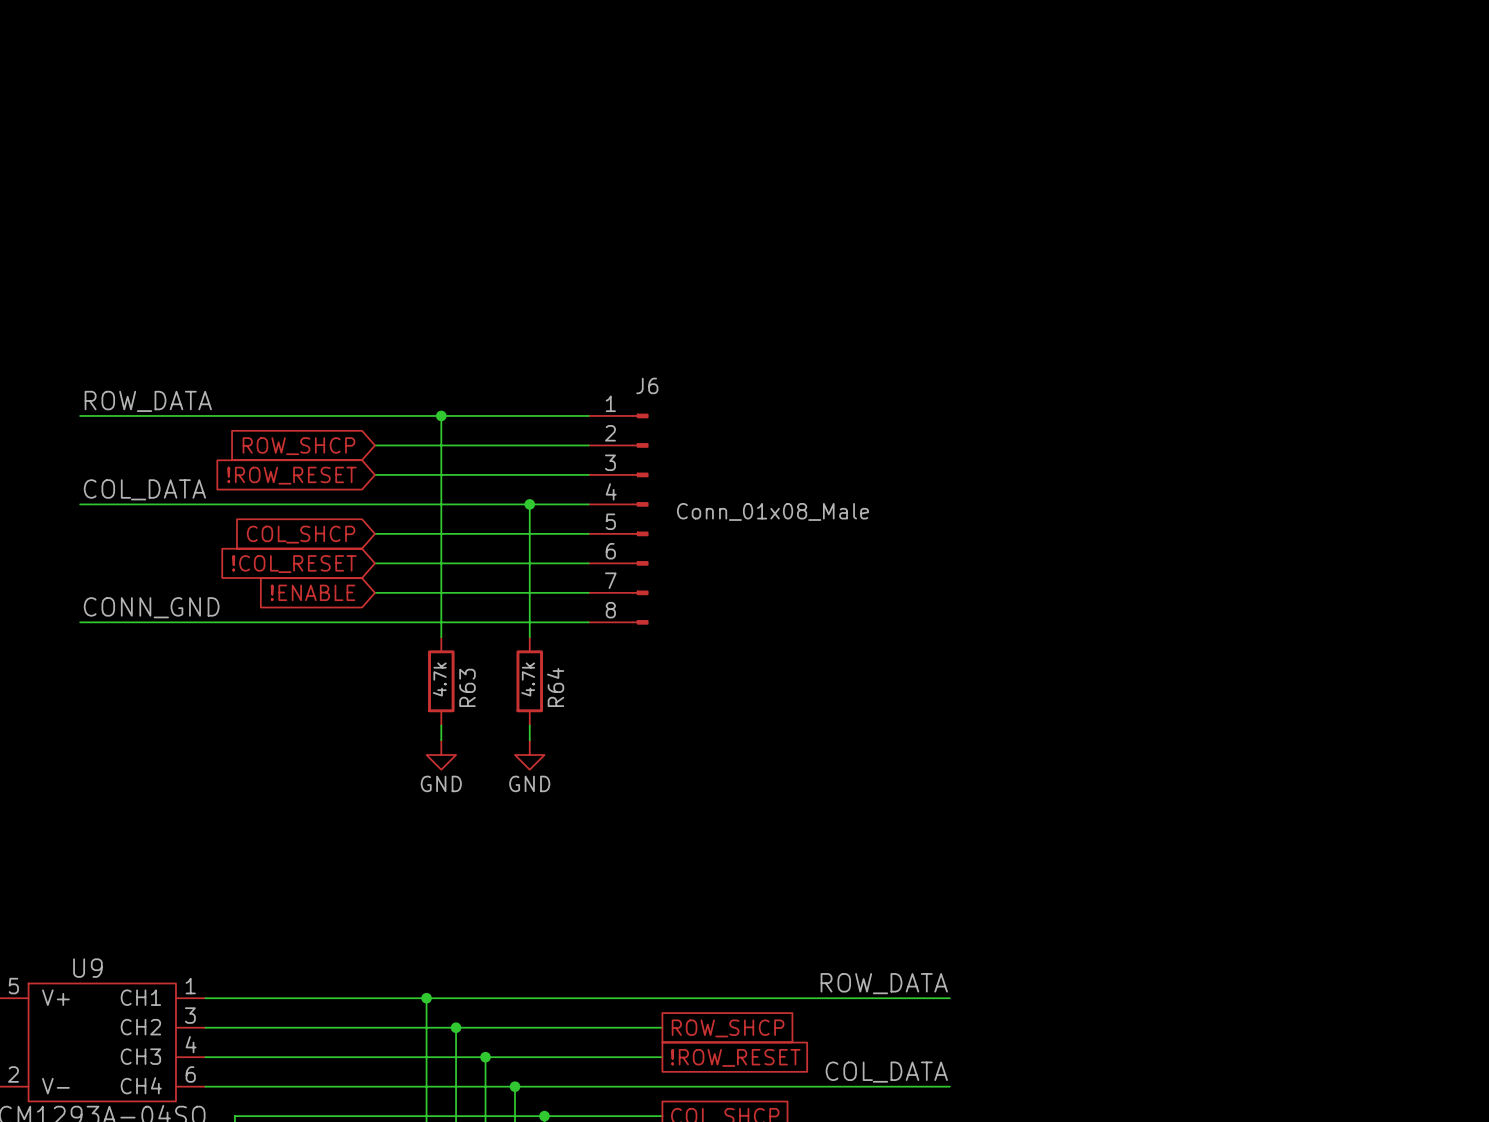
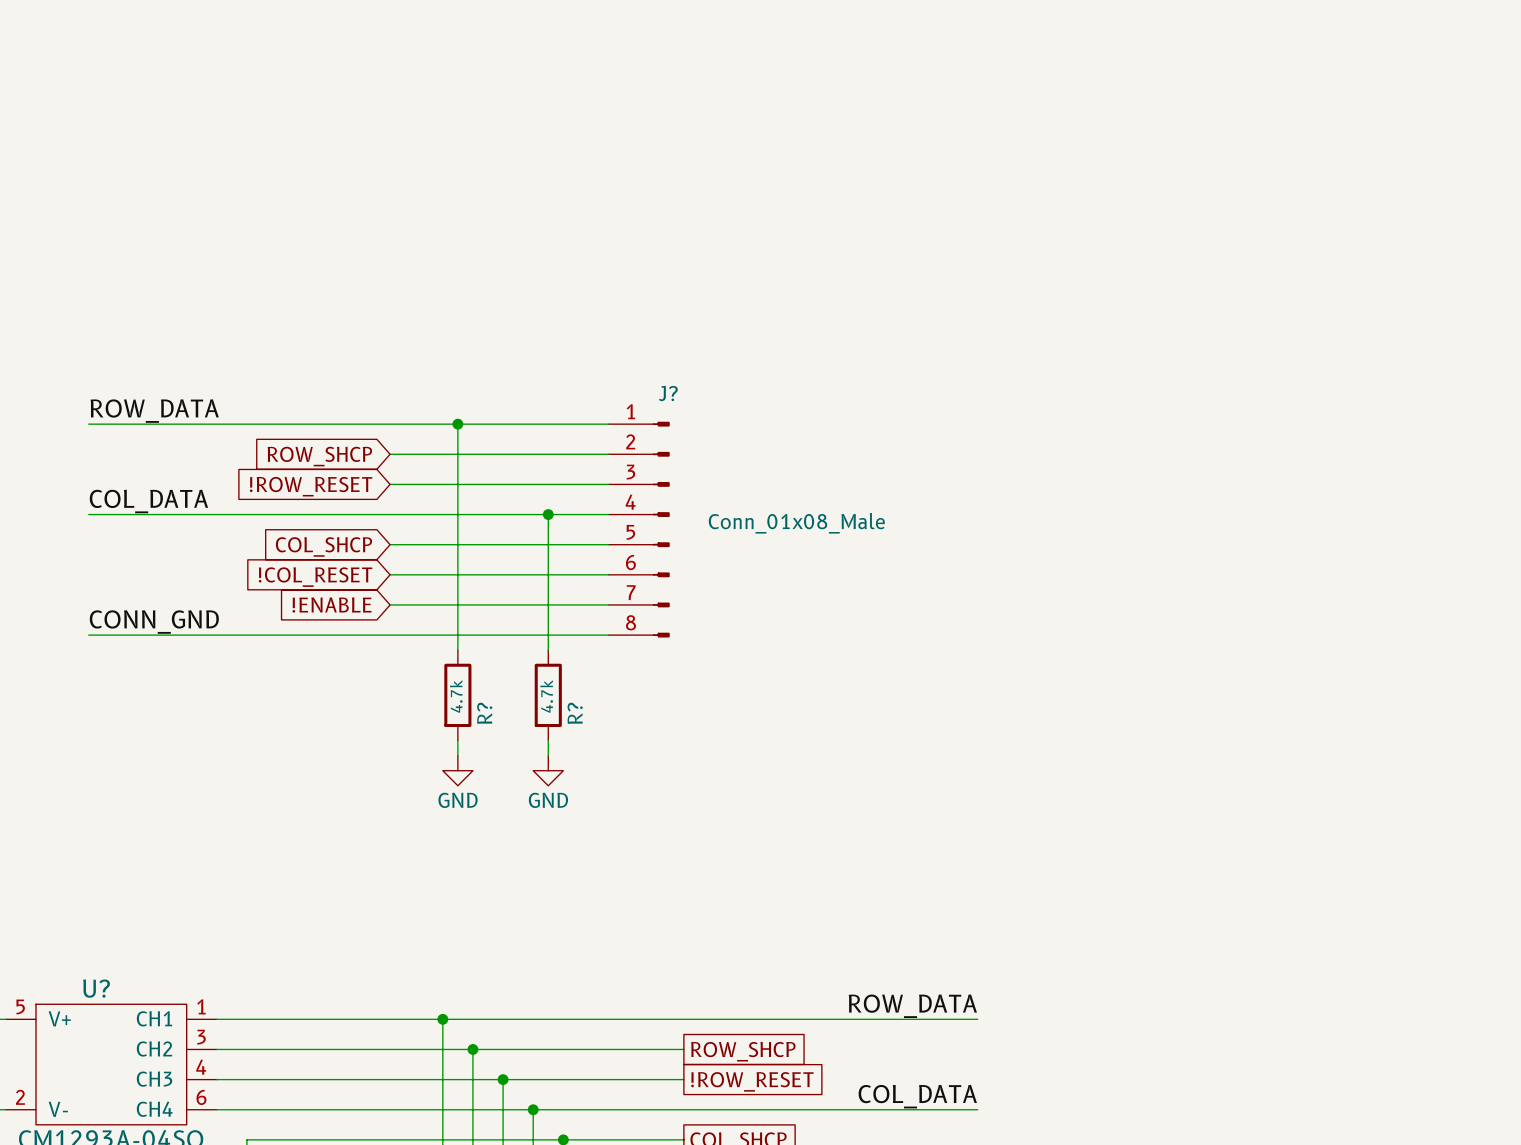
J6 name: J6 (647, 385) -> J? (668, 393)
R63 name: R63 (467, 687) -> R? (484, 713)
R64 name: R64 (555, 687) -> R? (575, 713)
U9 name: U9 (87, 968) -> U? (96, 988)

